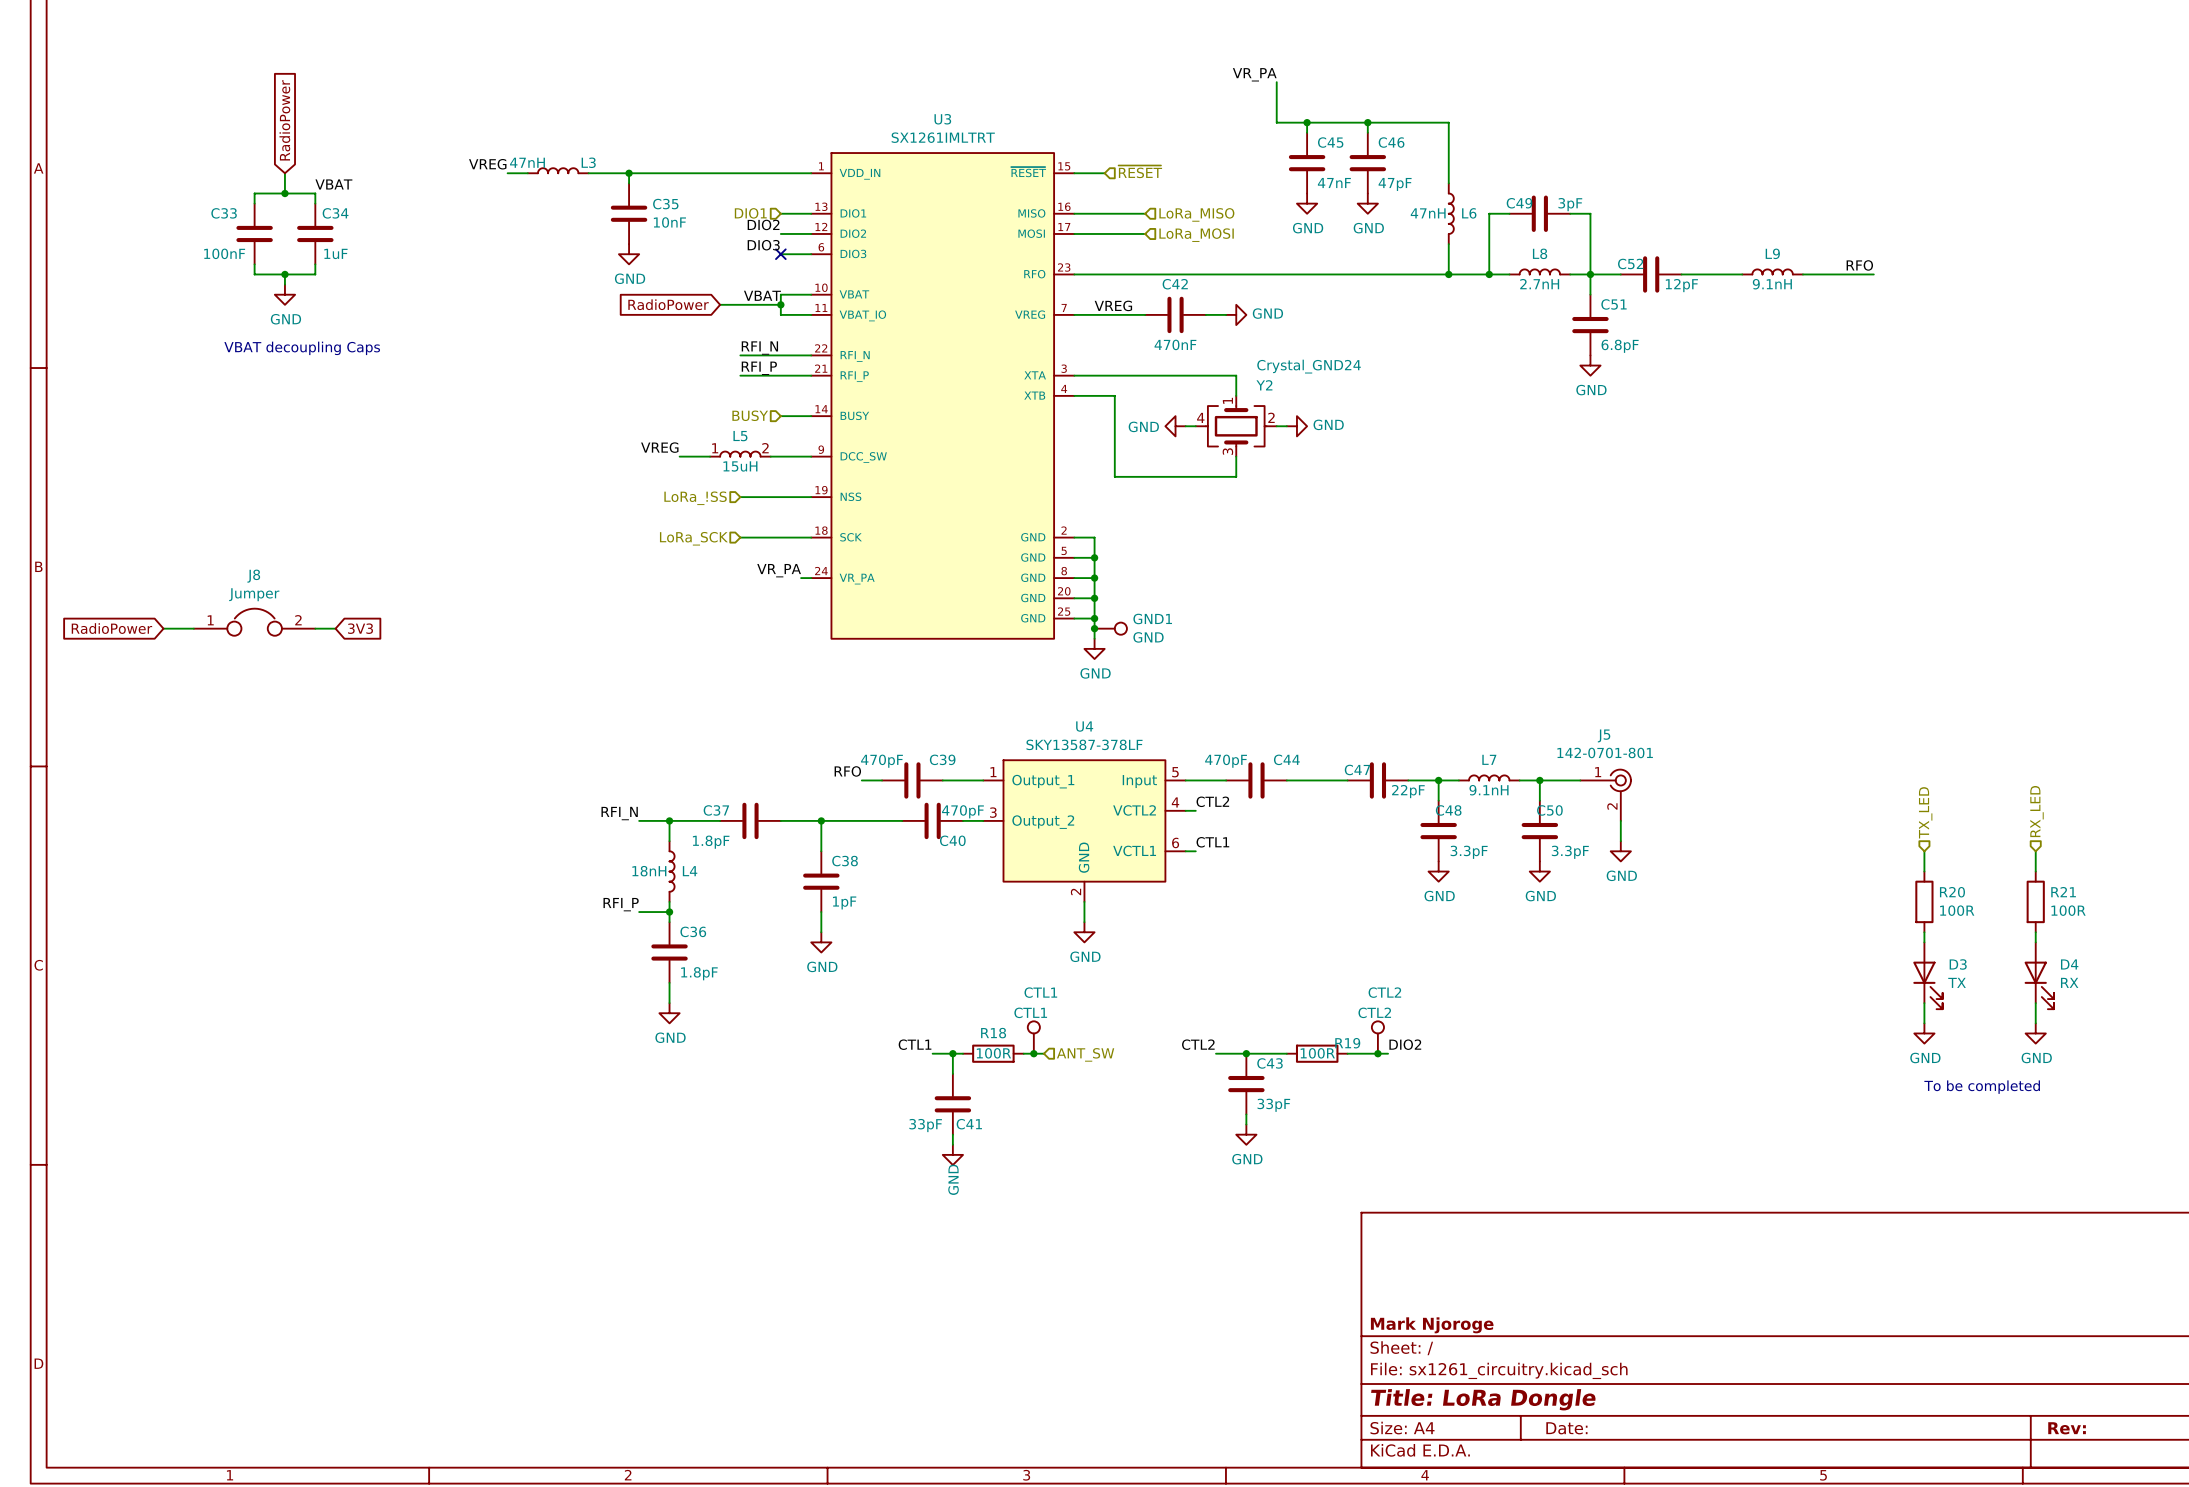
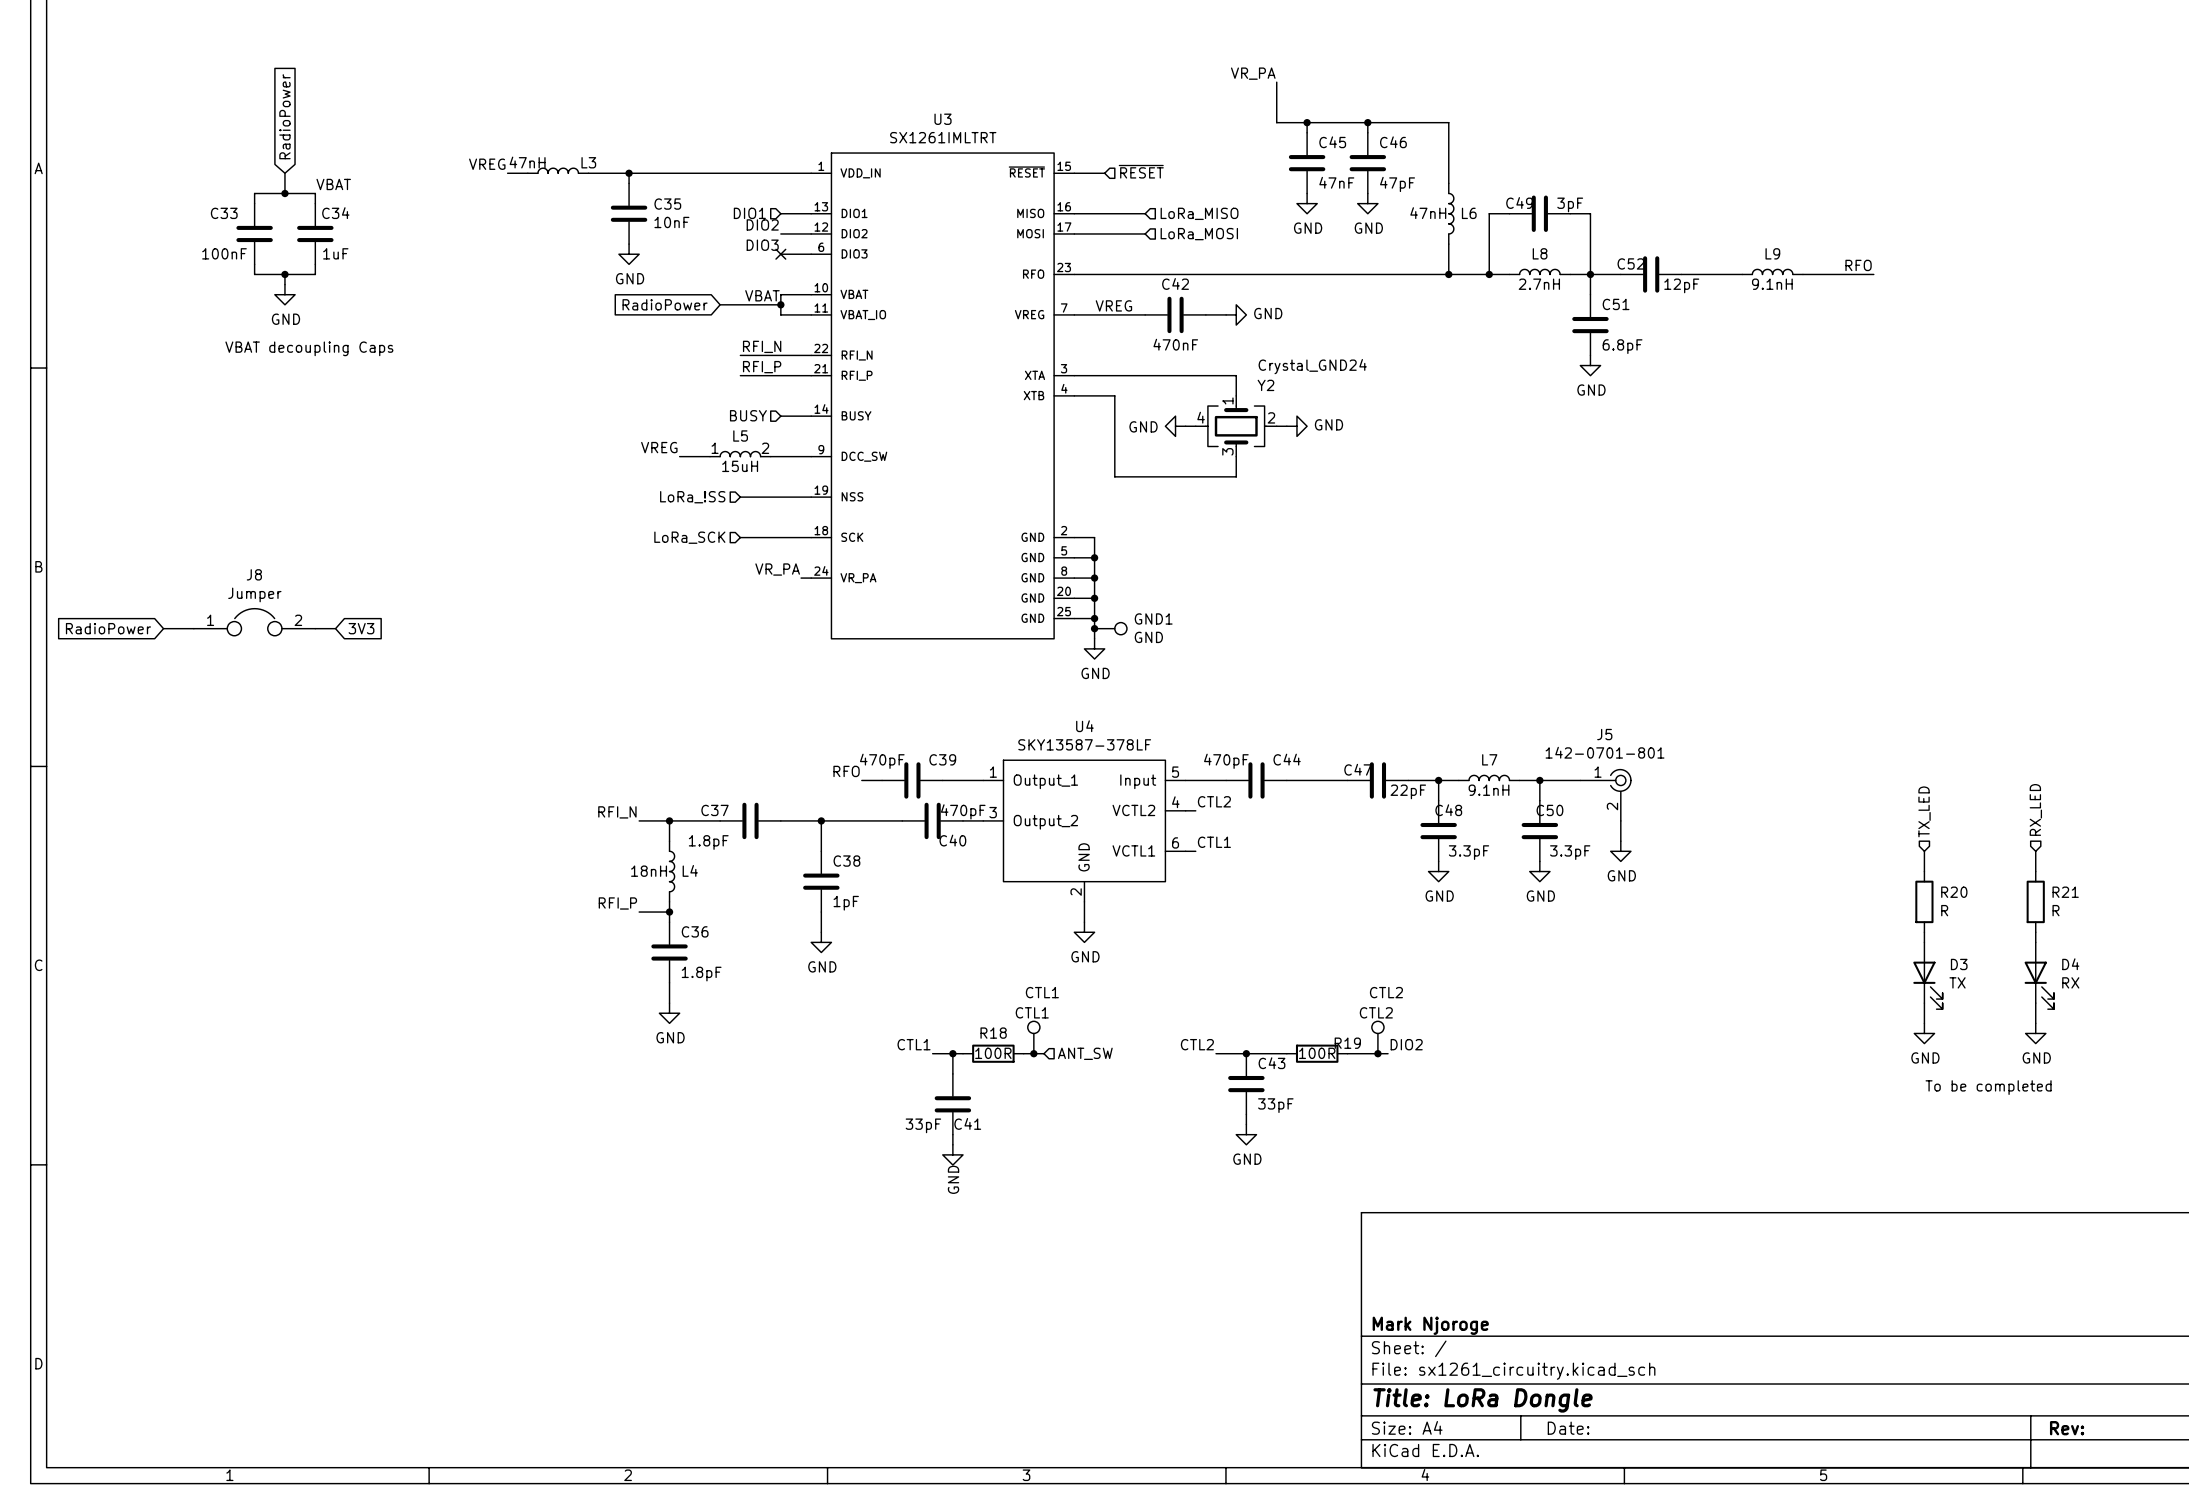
R20 value: 100R (1957, 910) -> R (1944, 910)
R21 value: 100R (2068, 910) -> R (2056, 910)

